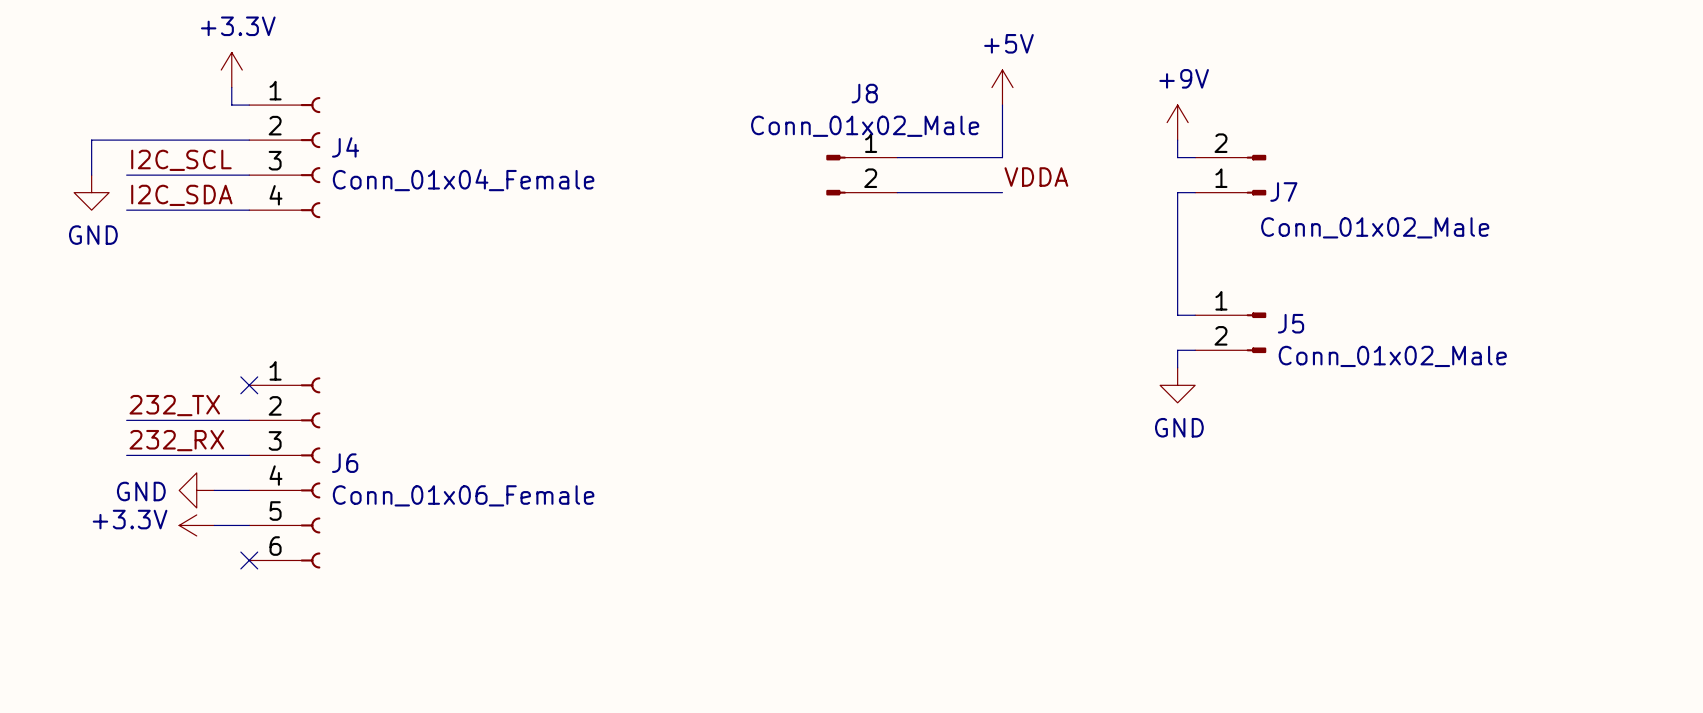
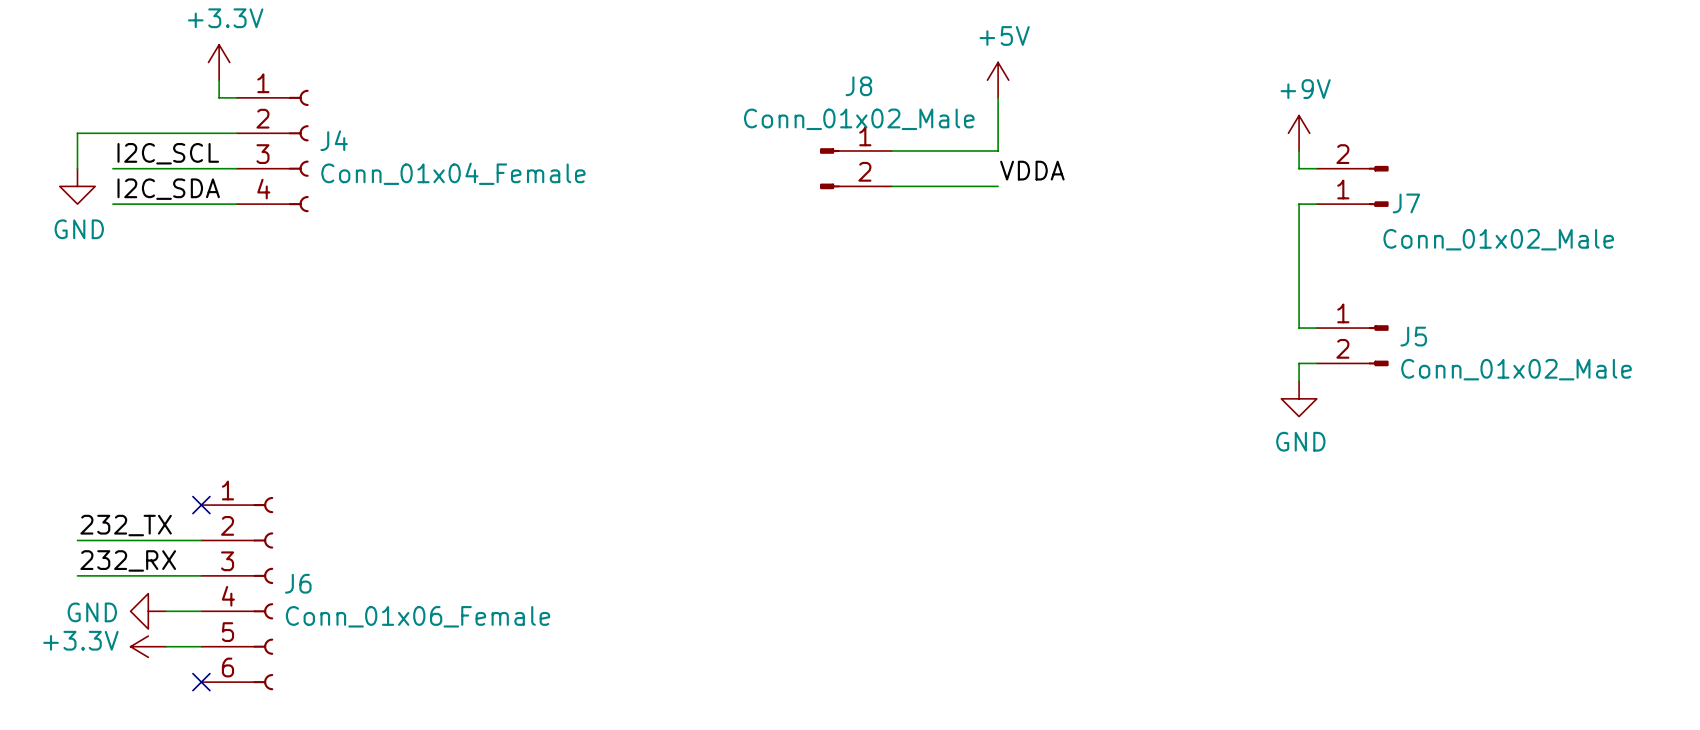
power symbol position: +9V (1177, 122) -> +9V (1299, 133)
wire: (1177, 140) (1177, 157) (1195, 157) -> (1299, 150) (1299, 168) (1316, 168)
J7 position: (1230, 175) -> (1352, 186)
wire: (1195, 192) (1177, 192) (1177, 315) (1195, 315) -> (1316, 204) (1299, 204) (1299, 328) (1316, 328)
J5 position: (1230, 332) -> (1352, 345)
wire: (1195, 350) (1177, 350) (1177, 367) -> (1316, 363) (1299, 363) (1299, 381)
no-connect mark: (249, 385) -> none
power symbol position: GND (1177, 385) -> GND (1299, 398)
label position: 232_TX (174, 405) -> 232_TX (126, 525)
wire: (126, 420) (249, 420) -> (77, 540) (201, 540)
label position: 232_RX (176, 440) -> 232_RX (128, 560)
wire: (126, 455) (249, 455) -> (77, 575) (201, 575)
J6 position: (284, 472) -> (237, 593)
power symbol position: GND (196, 490) -> GND (148, 611)
wire: (214, 490) (249, 490) -> (166, 611) (201, 611)
power symbol position: +3.3V (196, 525) -> +3.3V (148, 646)
wire: (214, 525) (249, 525) -> (166, 646) (201, 646)
no-connect mark position: (249, 560) -> (201, 505)
no-connect mark: none -> (201, 682)

